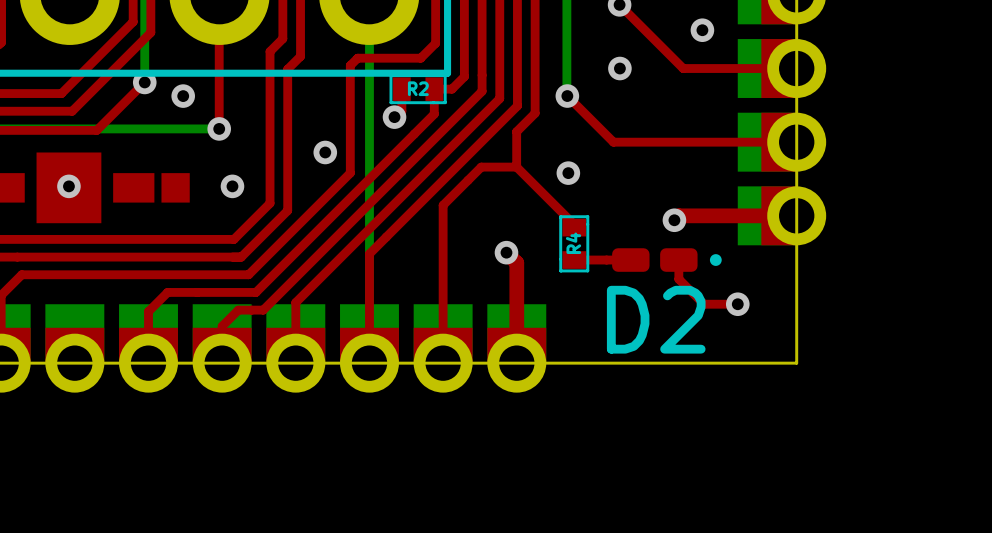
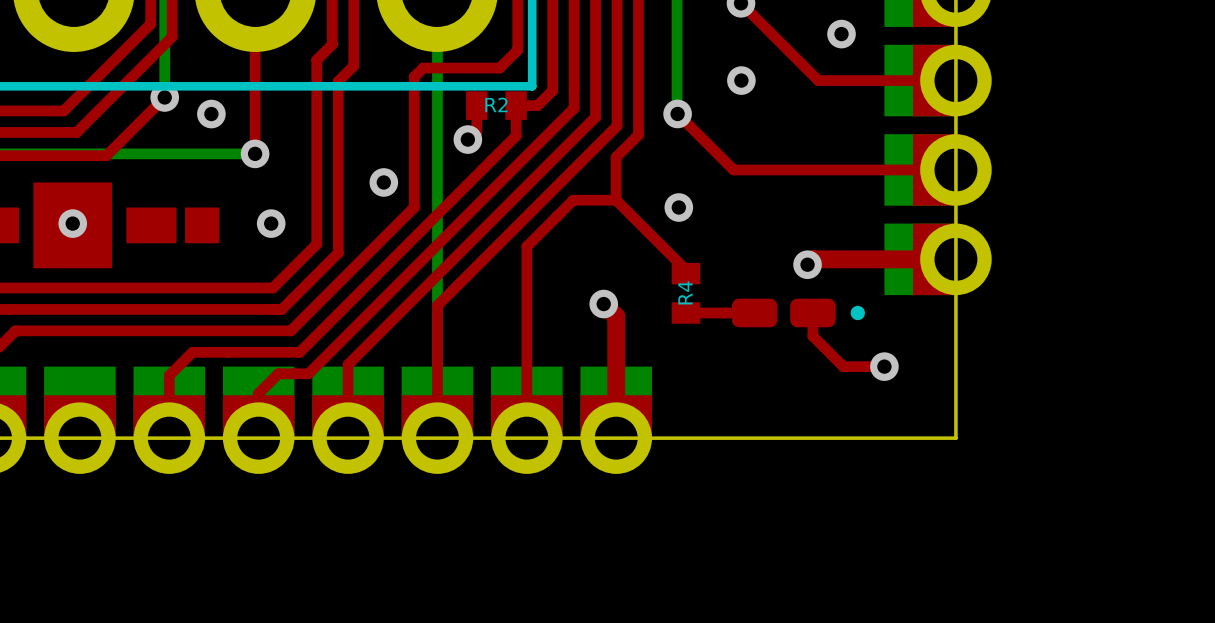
R2 footprint: [389, 74, 447, 105] -> [466, 91, 527, 120]
R4 footprint: [559, 215, 590, 273] -> [671, 262, 701, 324]
D2 name: D2 (656, 319) -> none

